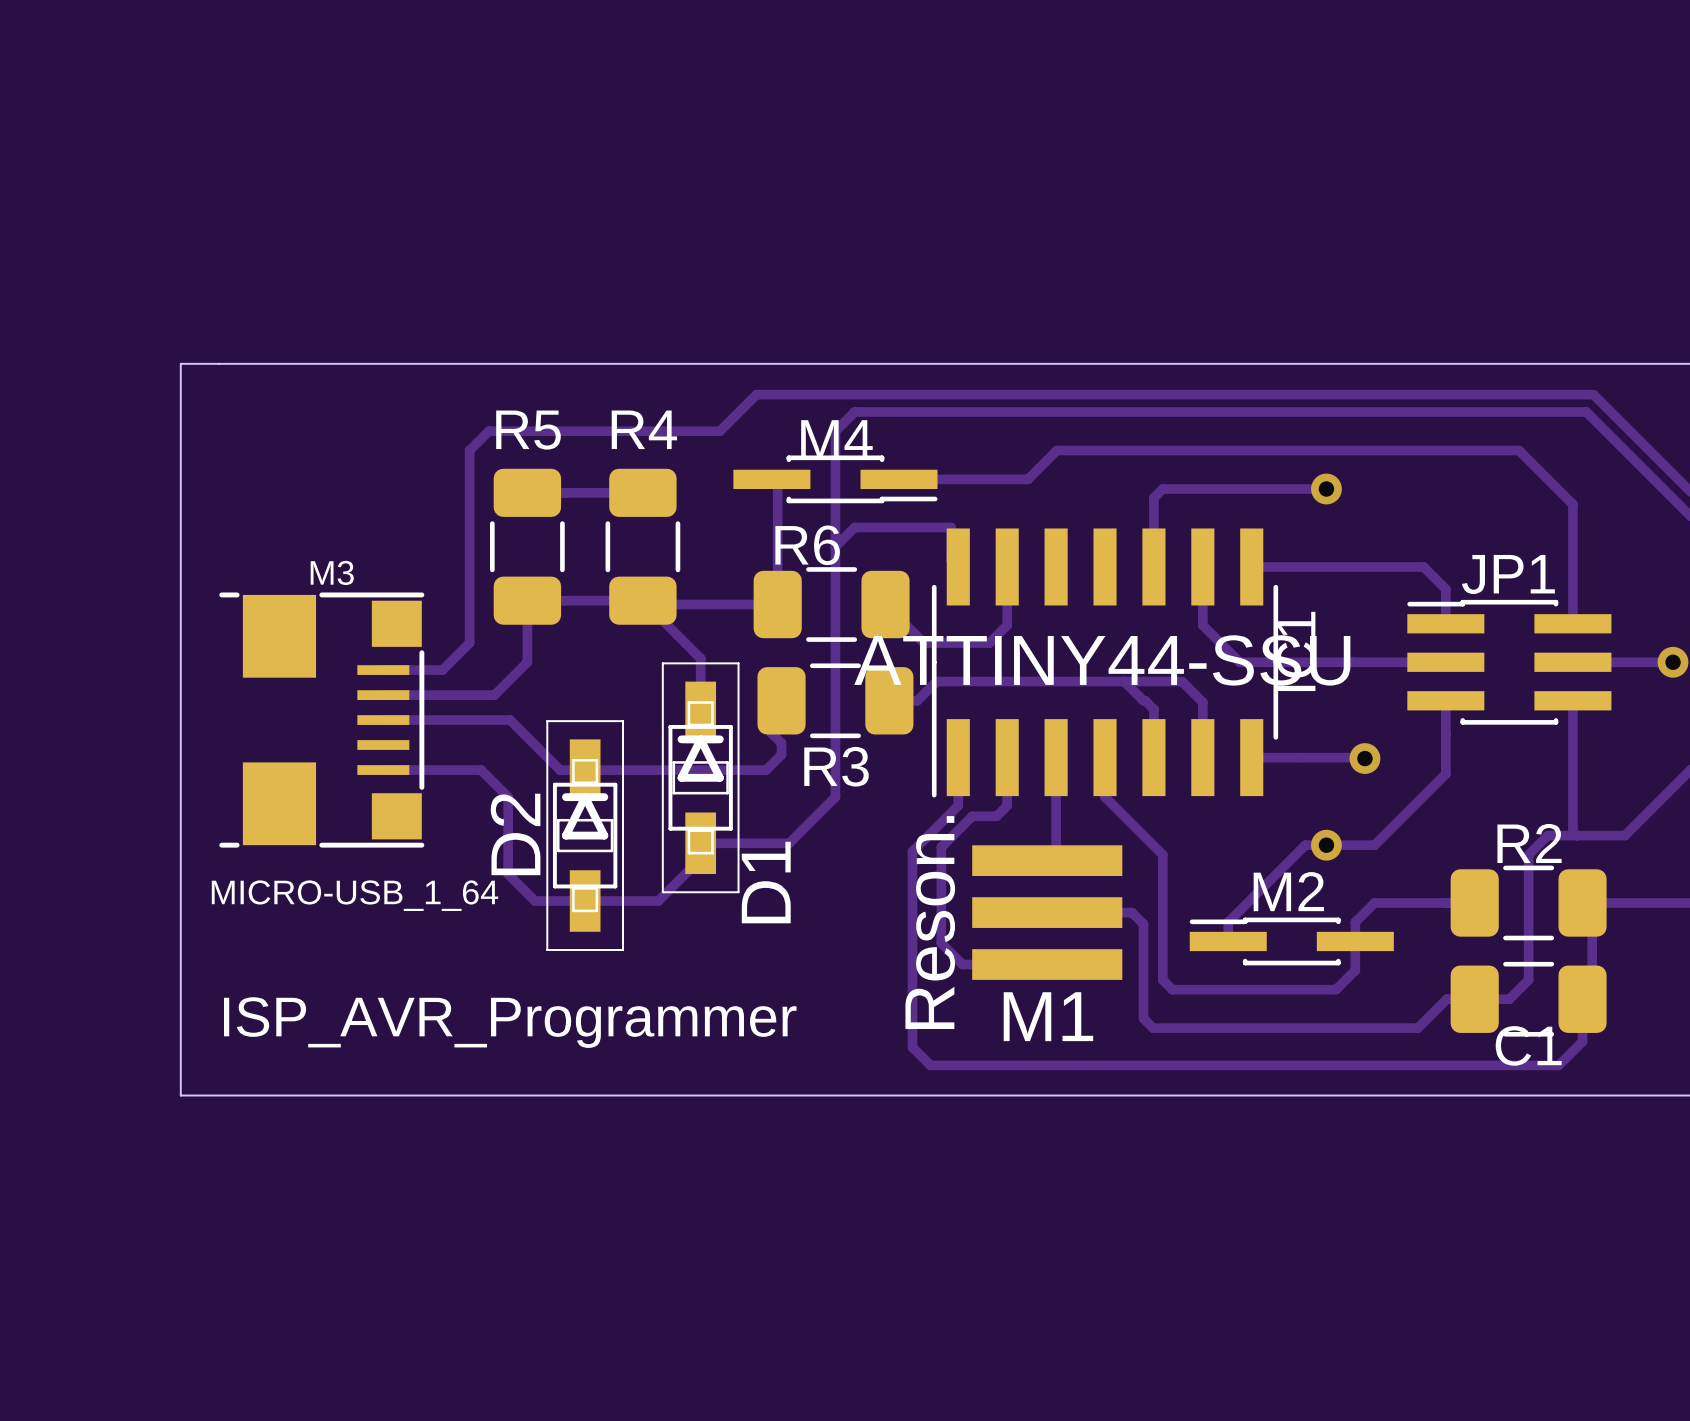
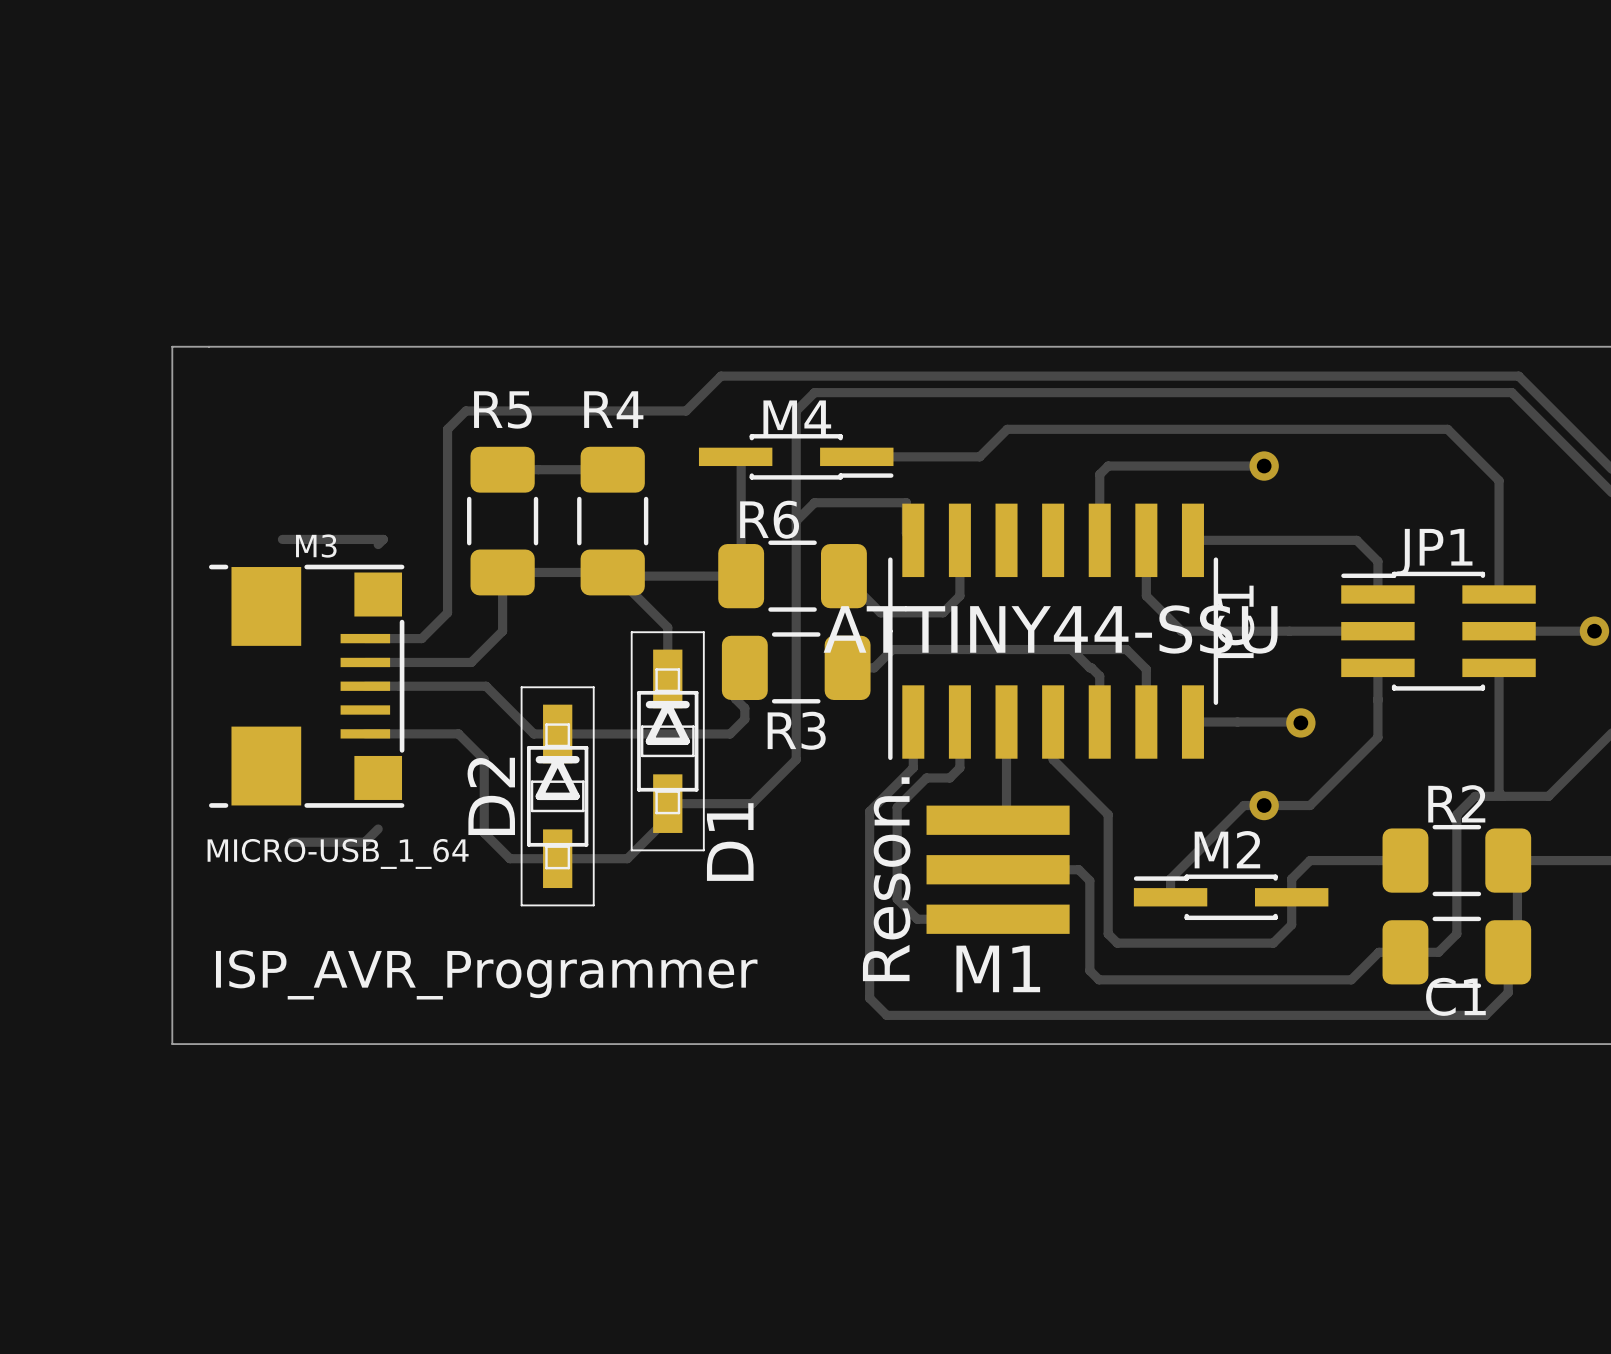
track: none -> (282, 539) (383, 539) (378, 544)
track: none -> (378, 829) (364, 842) (291, 842)

